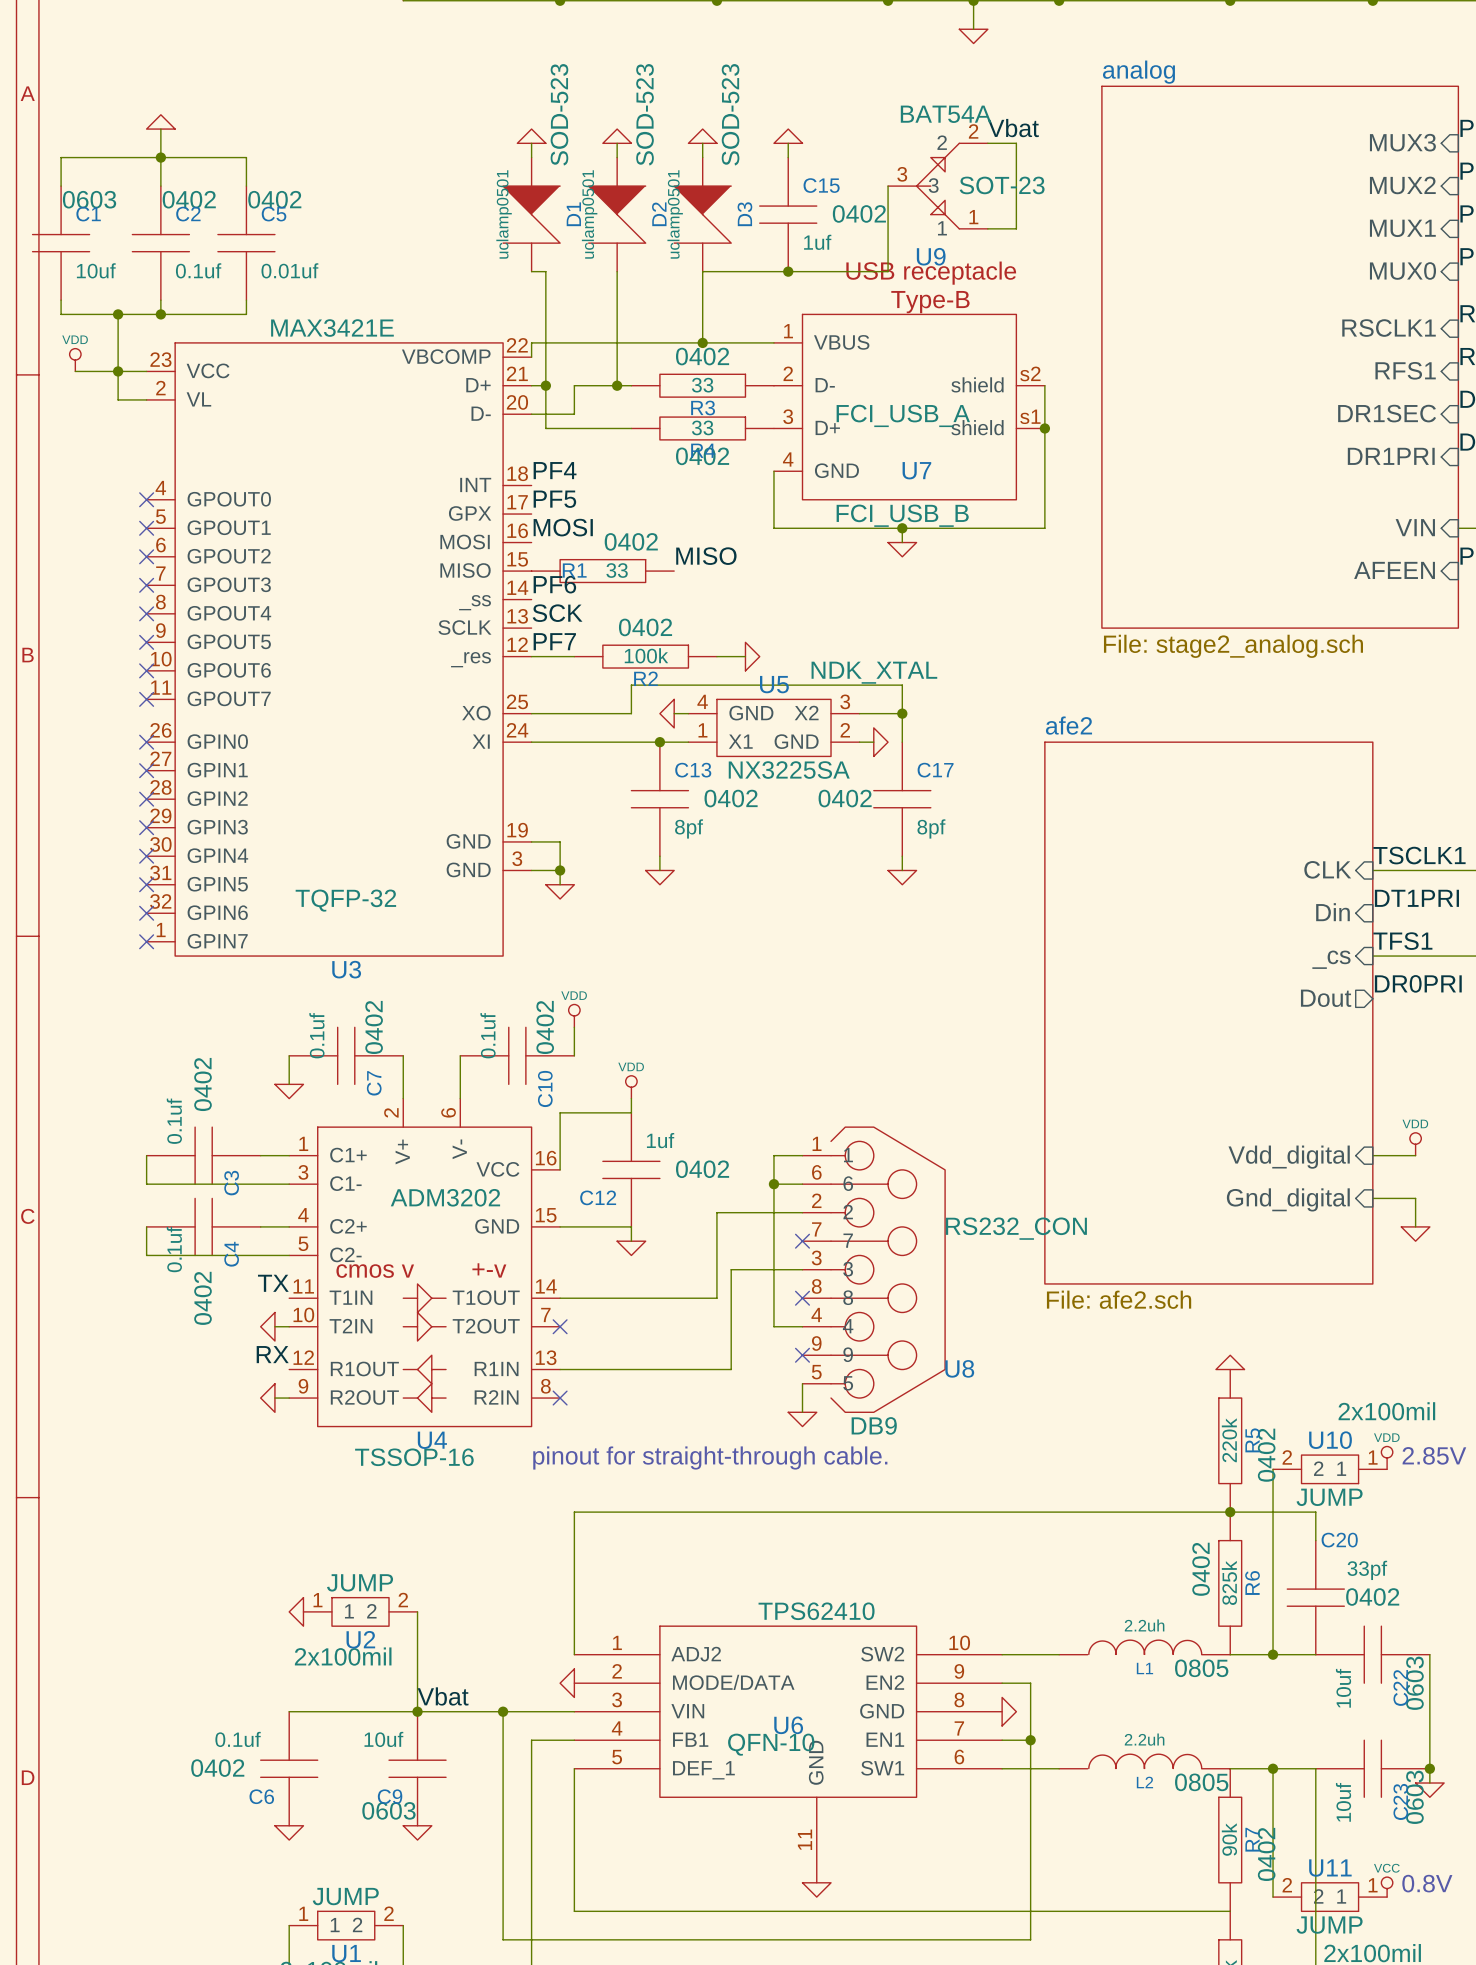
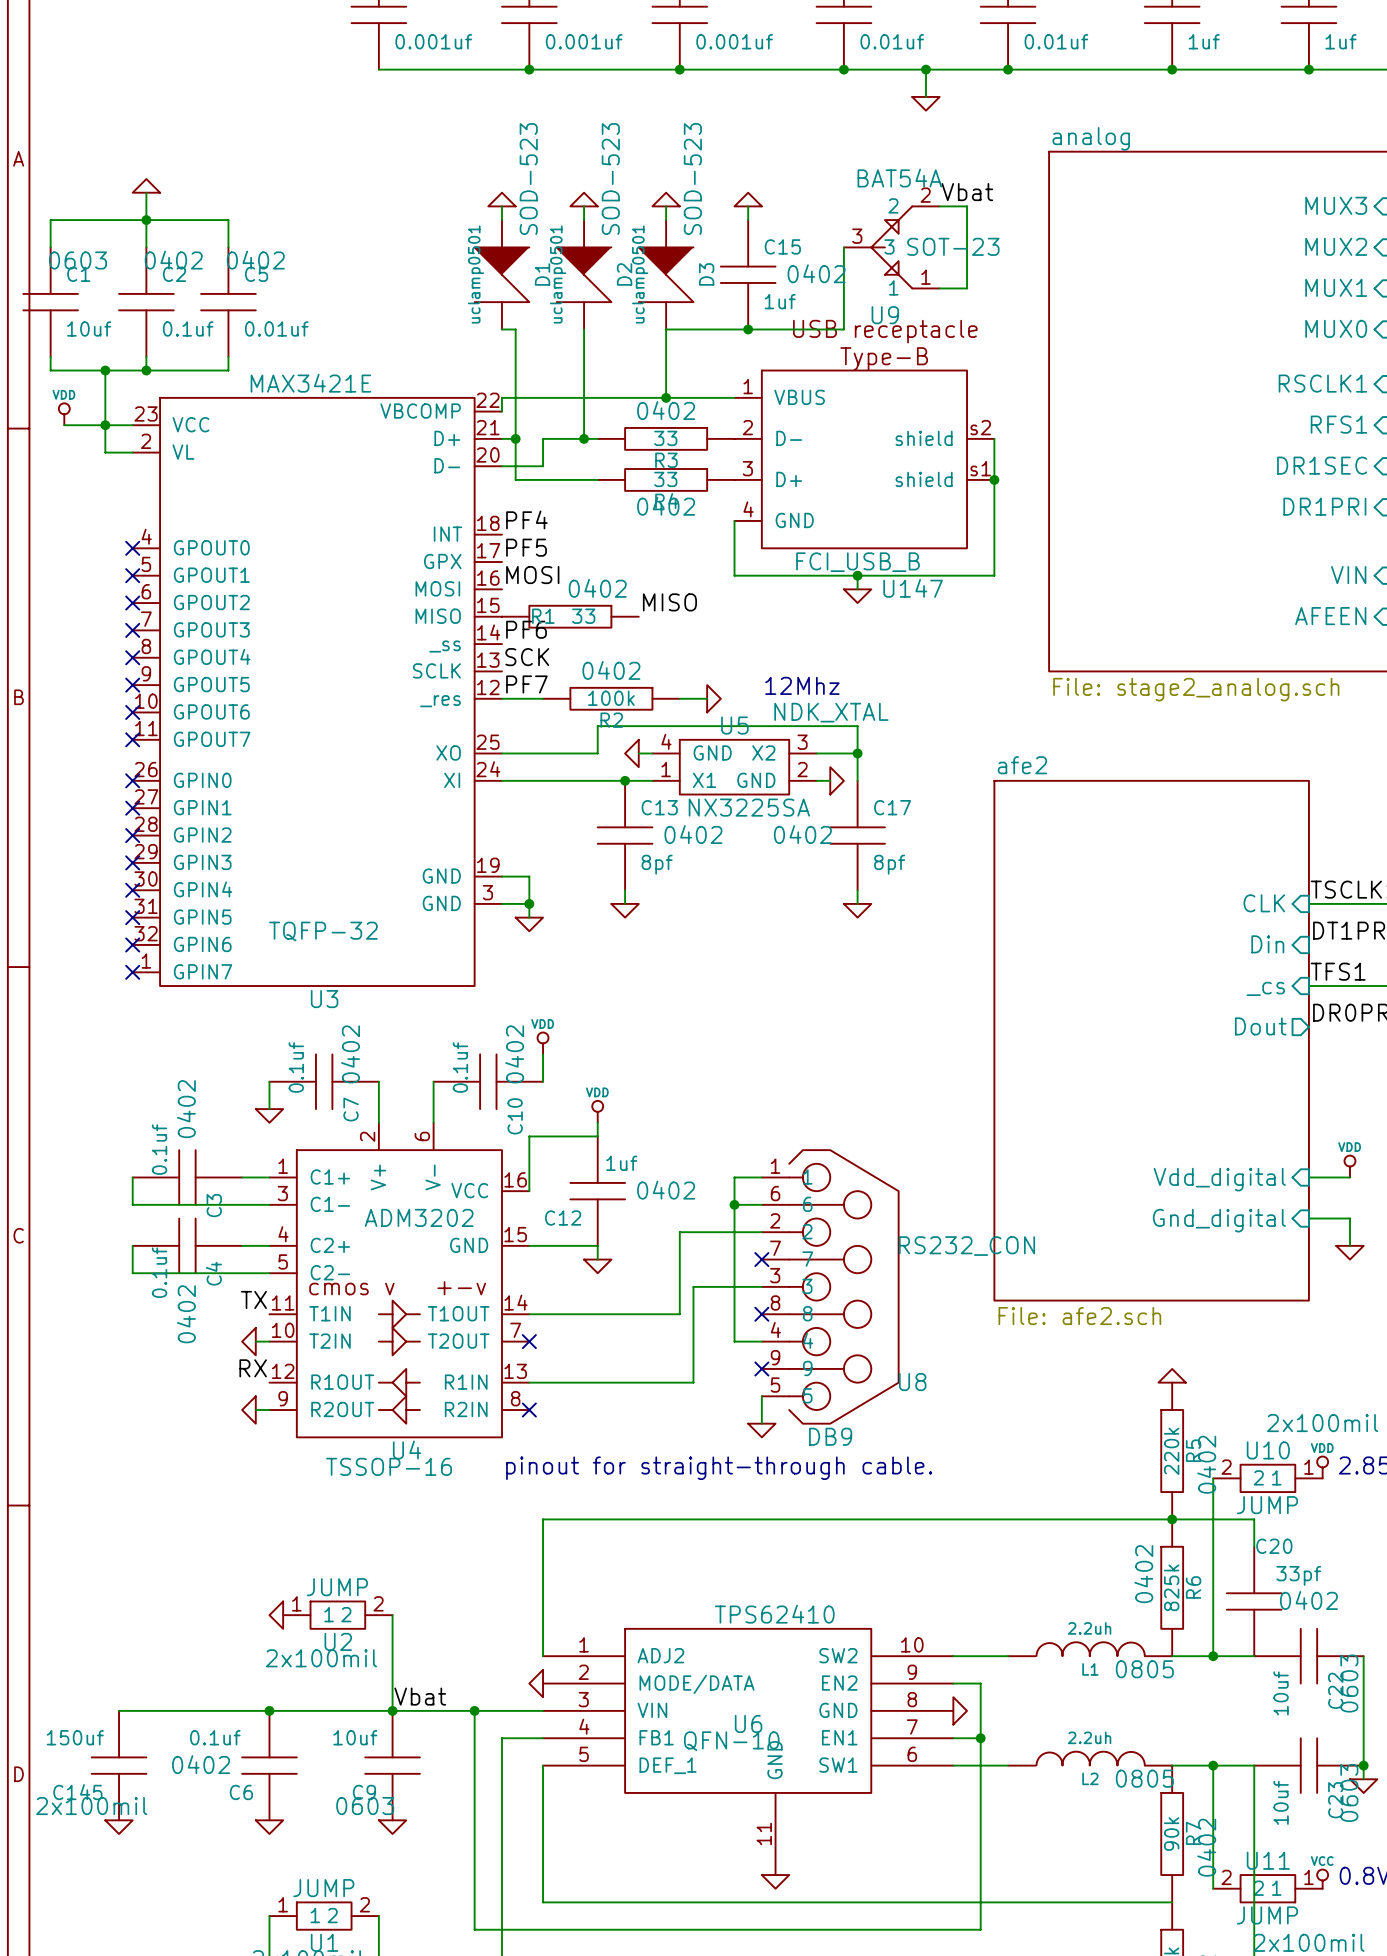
U7 text: FCI_USB_A (903, 415) -> none
U7 name: U7 (916, 470) -> U147 (913, 588)
text: none -> 12Mhz (802, 685)
wire: none -> (119, 1710) (269, 1710)
junction: none -> (269, 1710)
C145: none -> 150uf (119, 1765)
power symbol: none -> (119, 1827)

